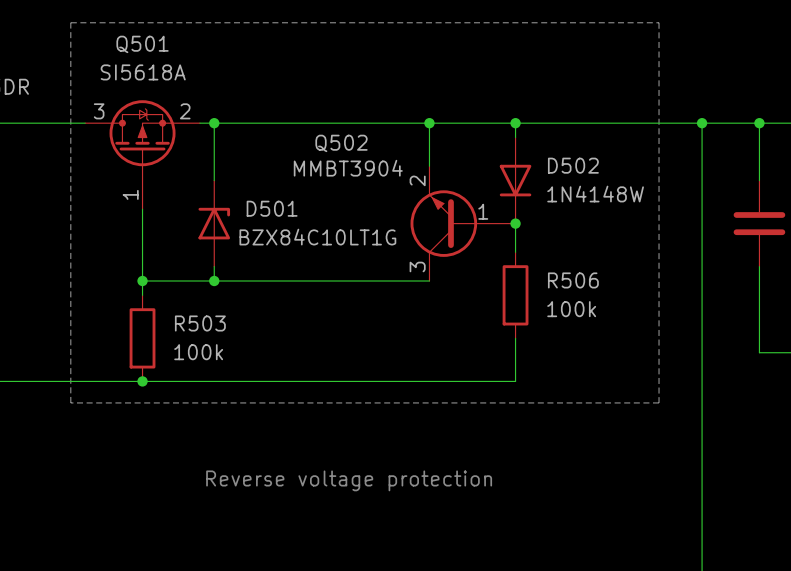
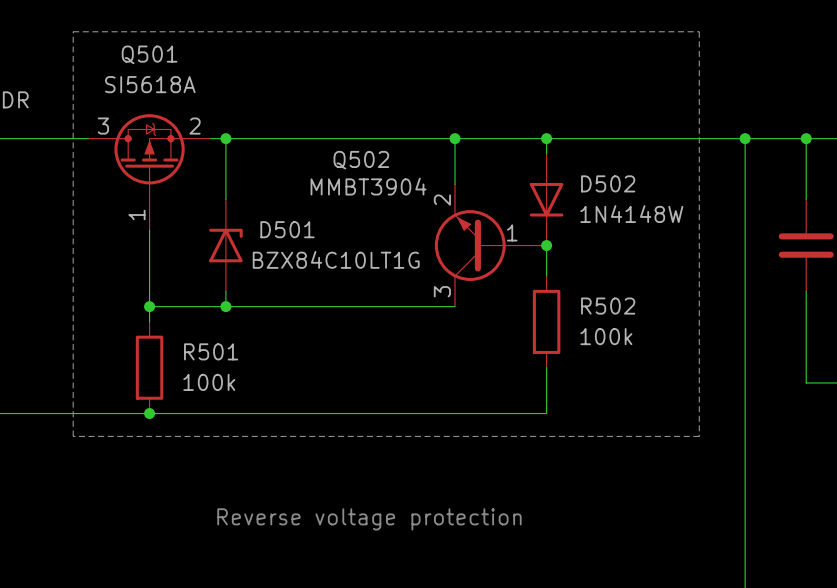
R506 name: R506 (573, 280) -> R502 (608, 306)
R503 name: R503 (200, 323) -> R501 (211, 351)

